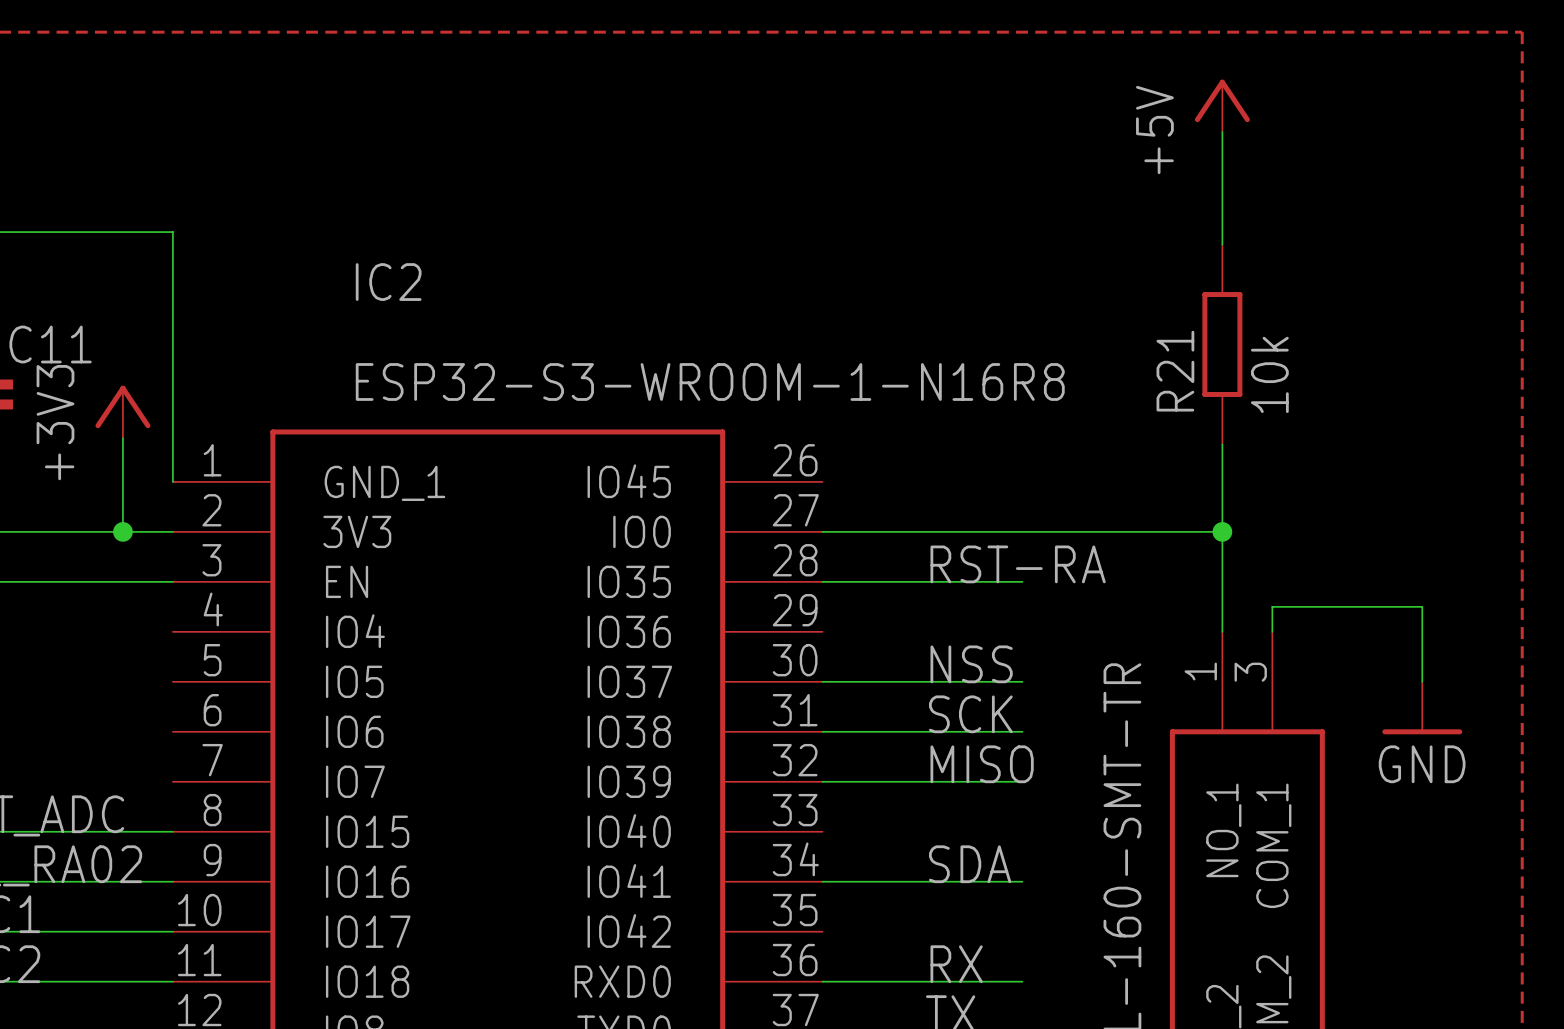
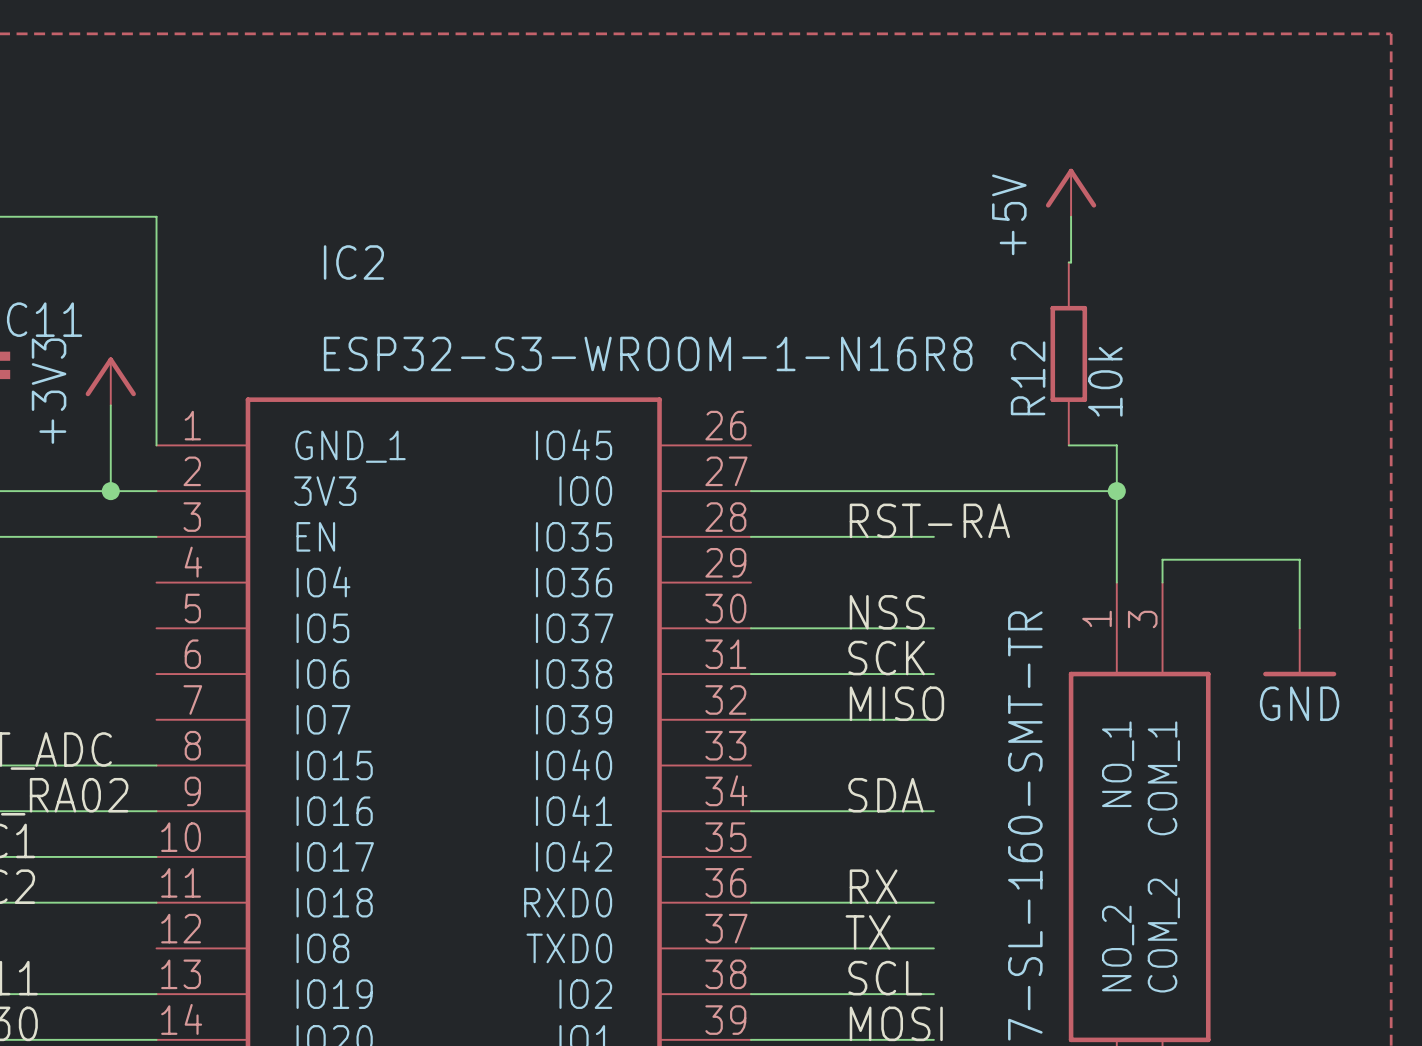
power symbol position: +5V (1222, 105) -> +5V (1071, 192)
wire: (1222, 132) (1222, 244) -> none
wire: none -> (1071, 216) (1071, 262) (1068, 262)
R21: 10k (1222, 344) -> none
R12: none -> 10k (1068, 353)
wire: (1222, 444) (1222, 481) -> (1068, 445) (1116, 445)

